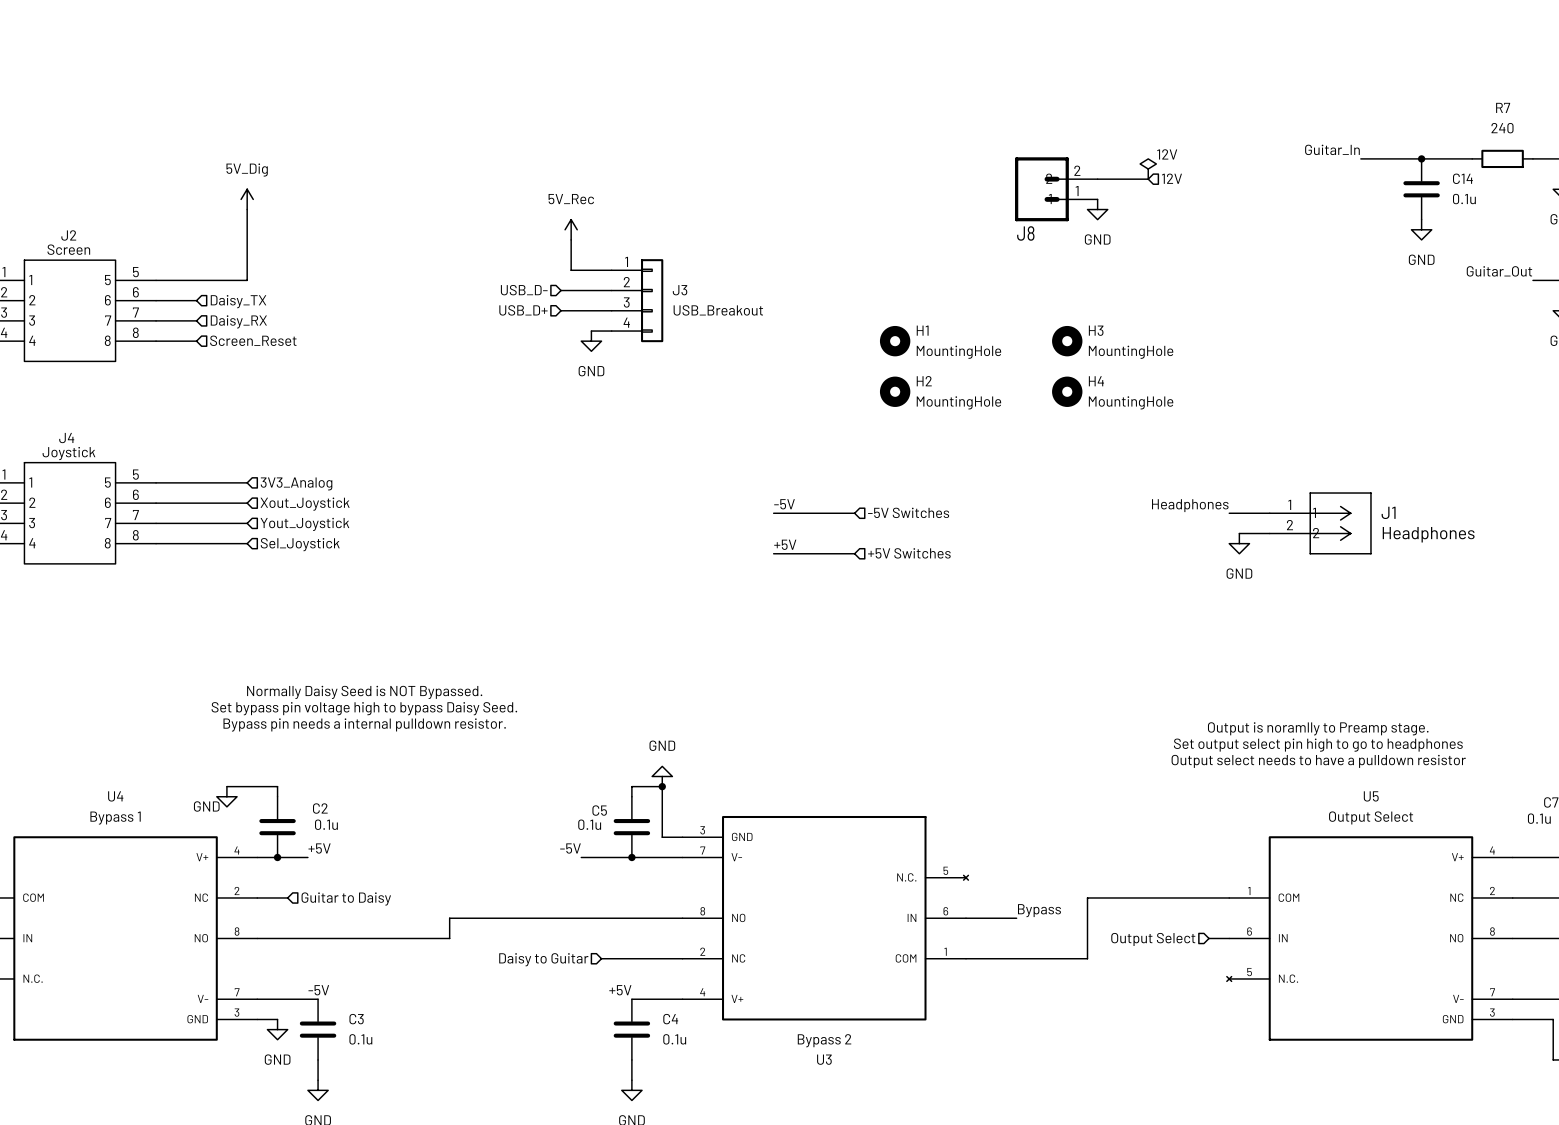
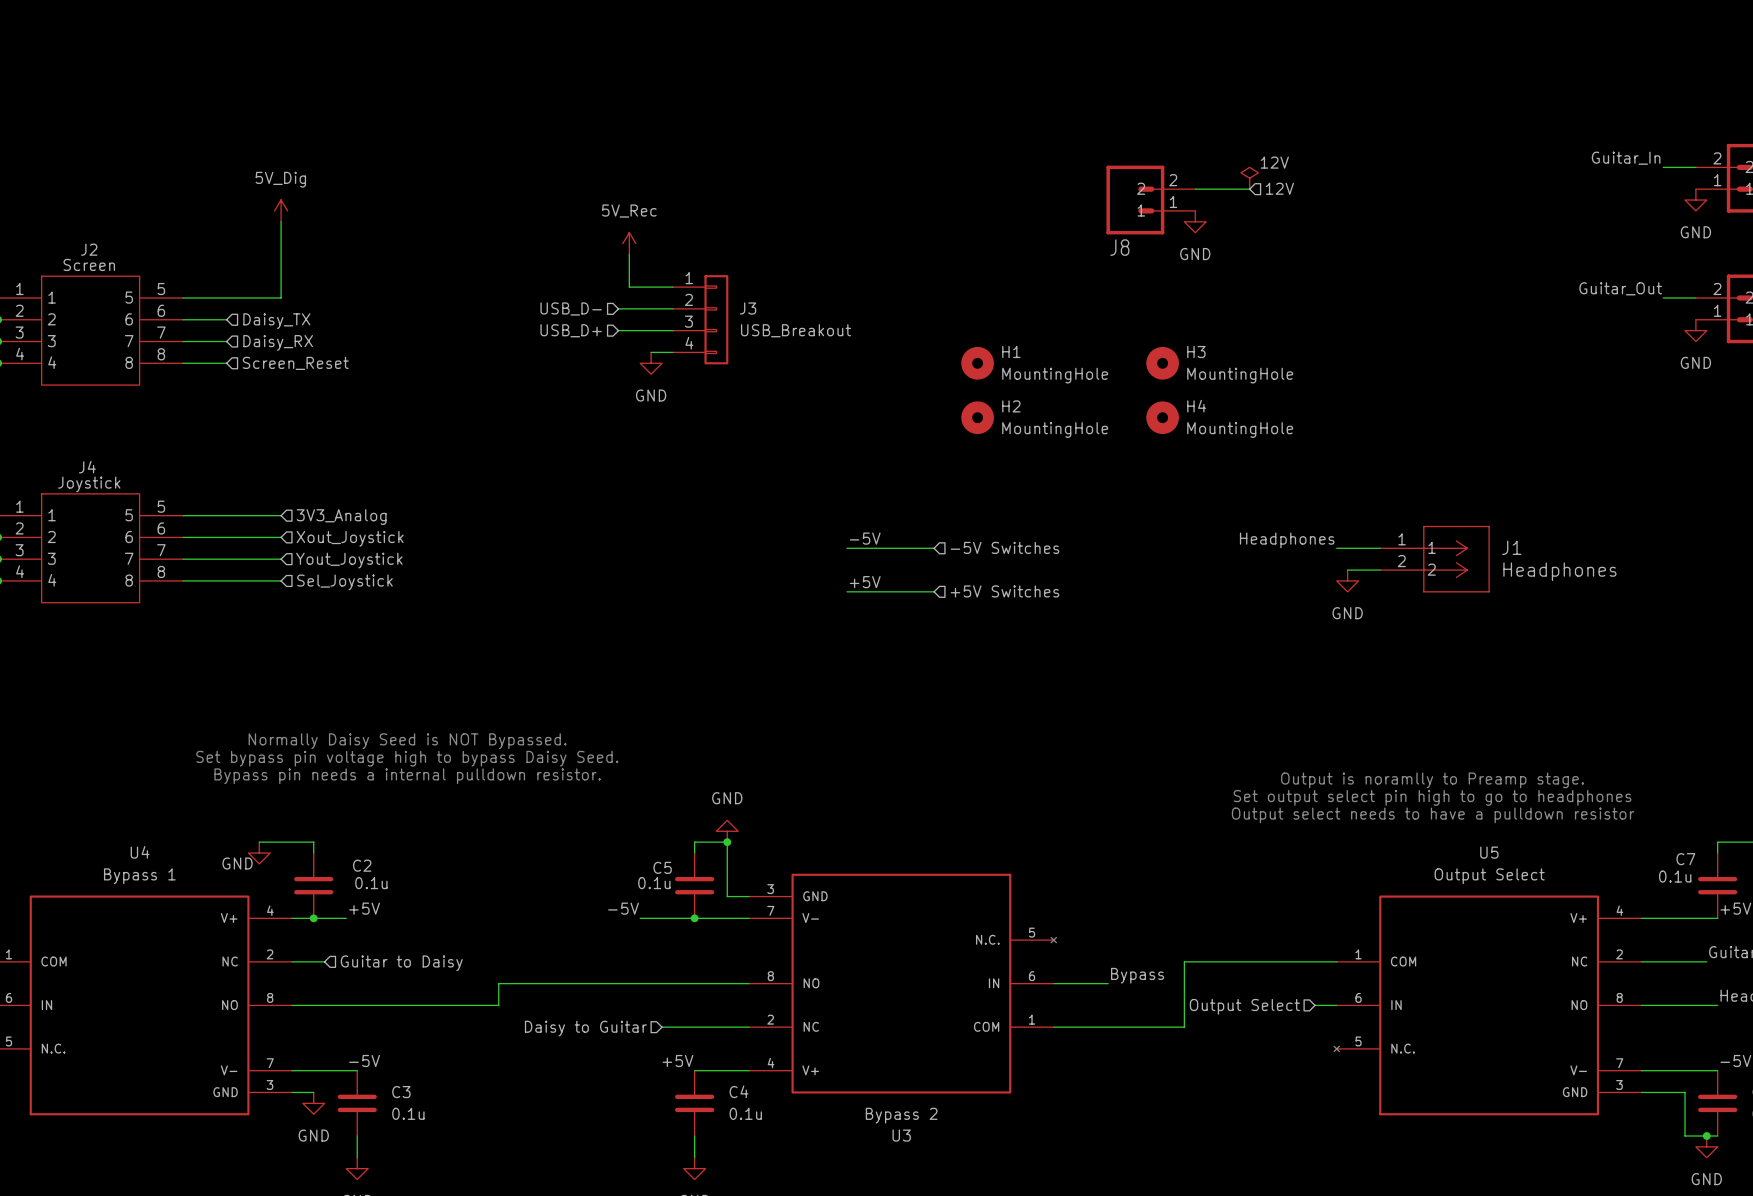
label position: Guitar_In (1332, 149) -> Guitar_In (1626, 158)
wire: (1360, 158) (1472, 158) -> none
junction: (1421, 158) -> none
R7: 240 (1502, 158) -> none
C14: 0.1u (1421, 189) -> none
power symbol: GND (1421, 229) -> none

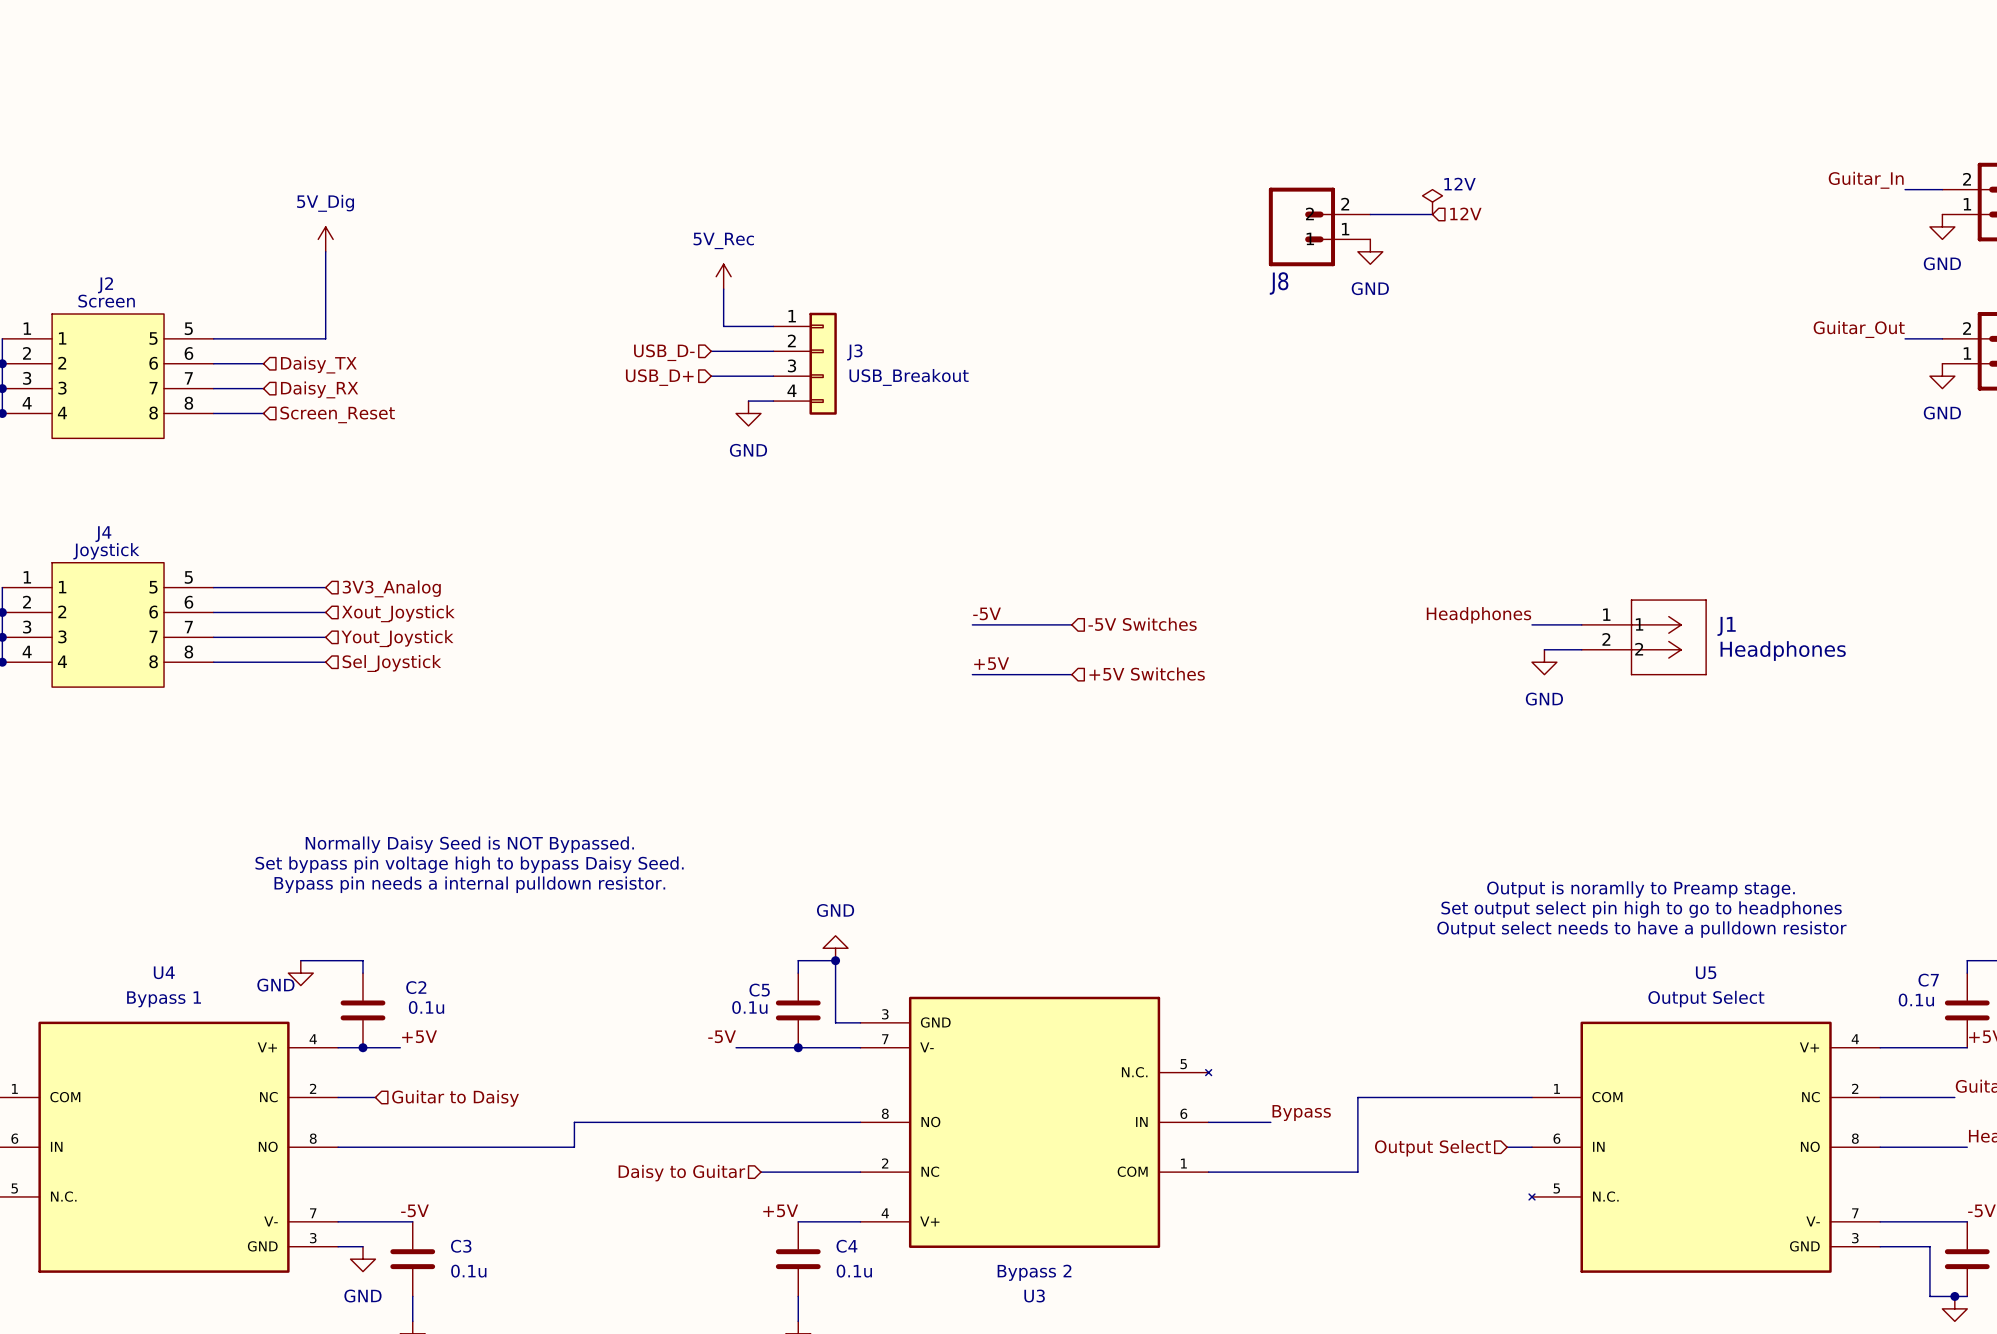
H1: MountingHole (977, 363) -> none
H3: MountingHole (1162, 363) -> none
H2: MountingHole (977, 417) -> none
H4: MountingHole (1162, 417) -> none

